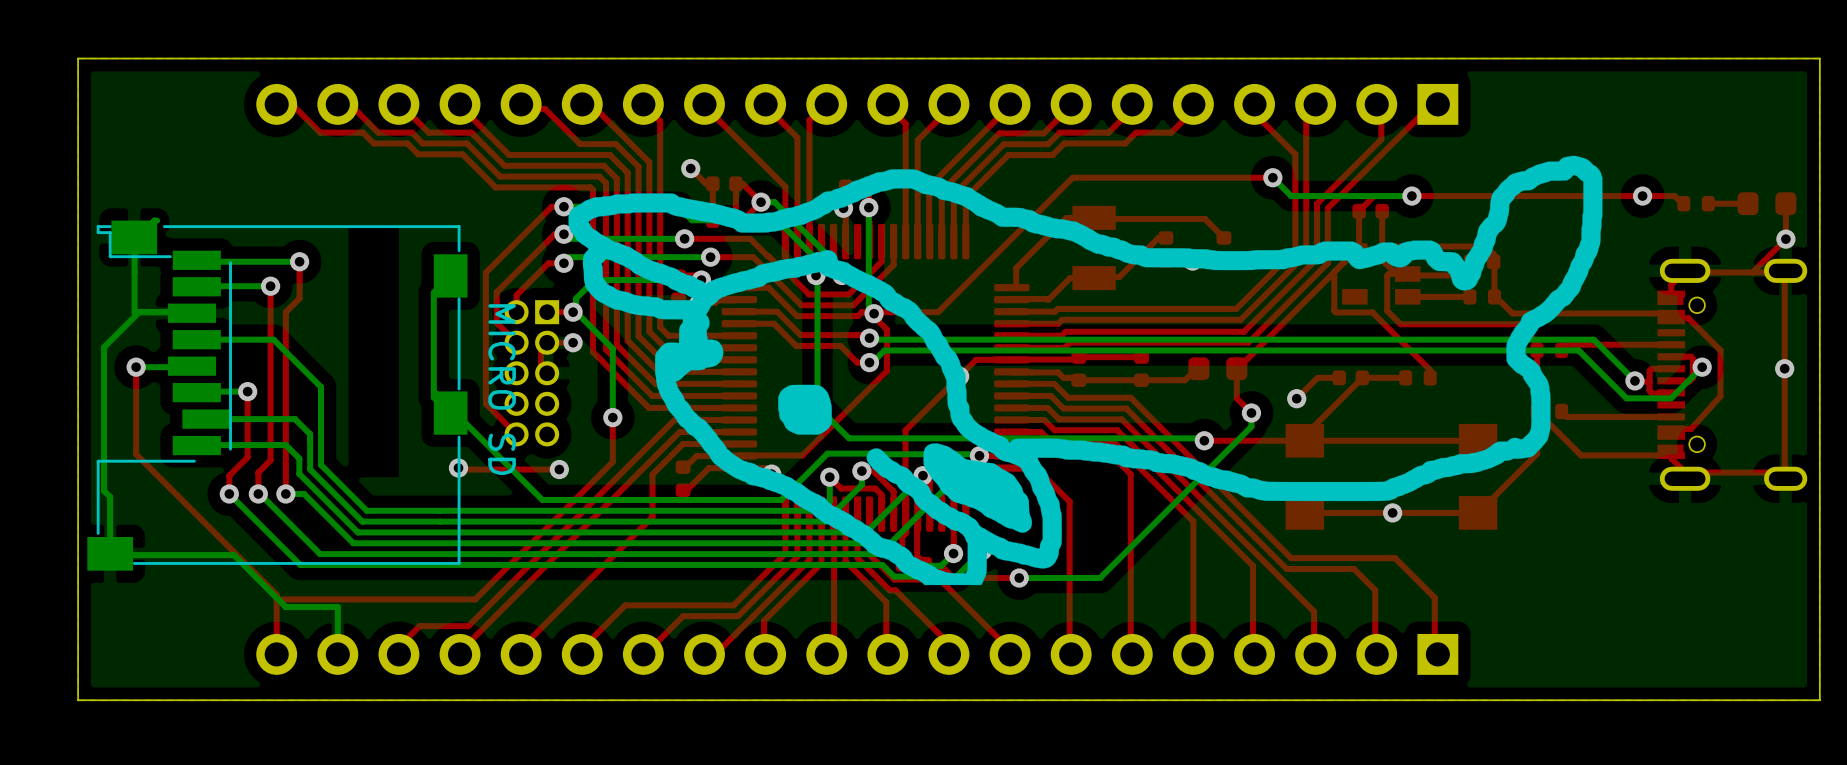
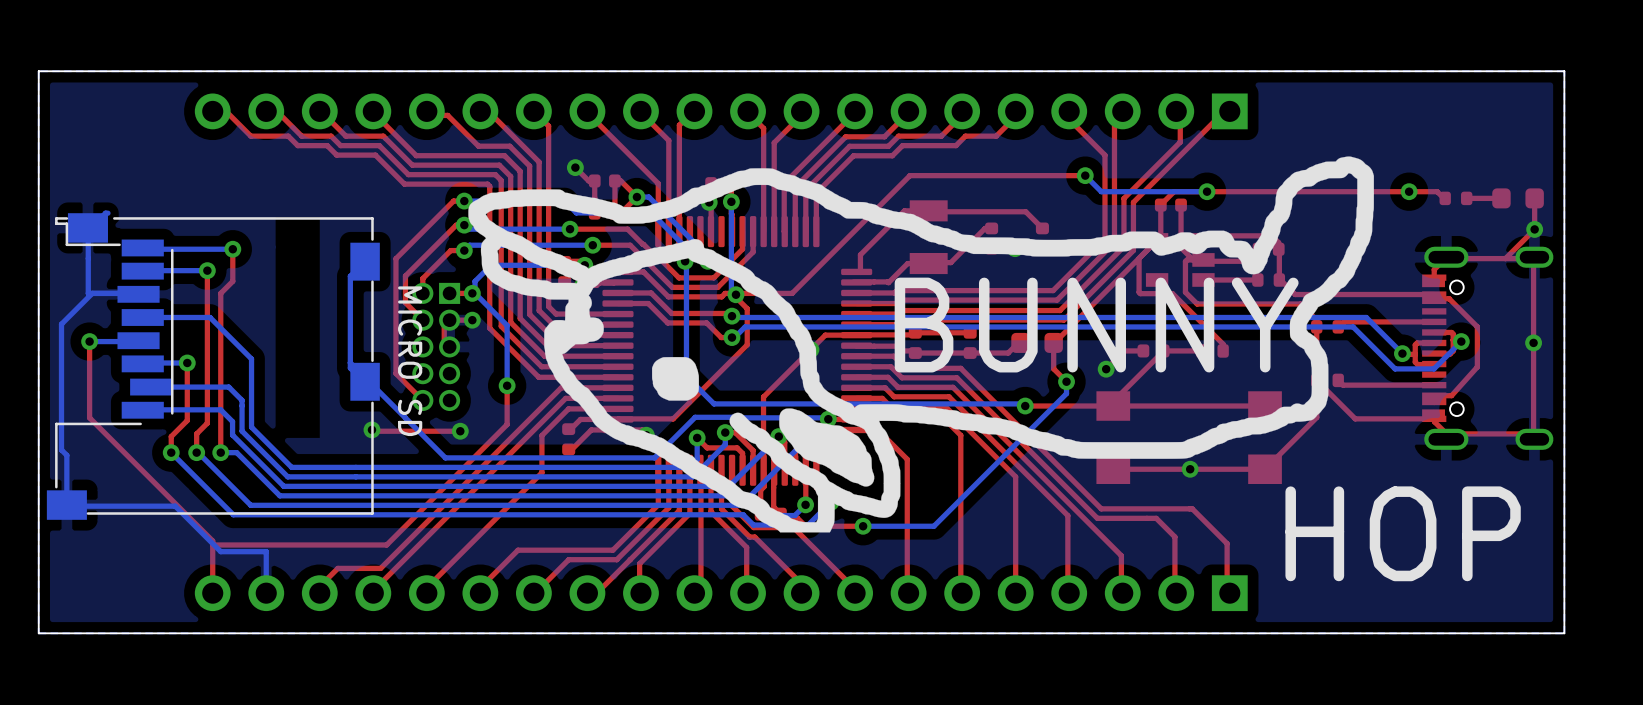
text: none -> BUNNY (1096, 325)
text: none -> HOP (1403, 533)

